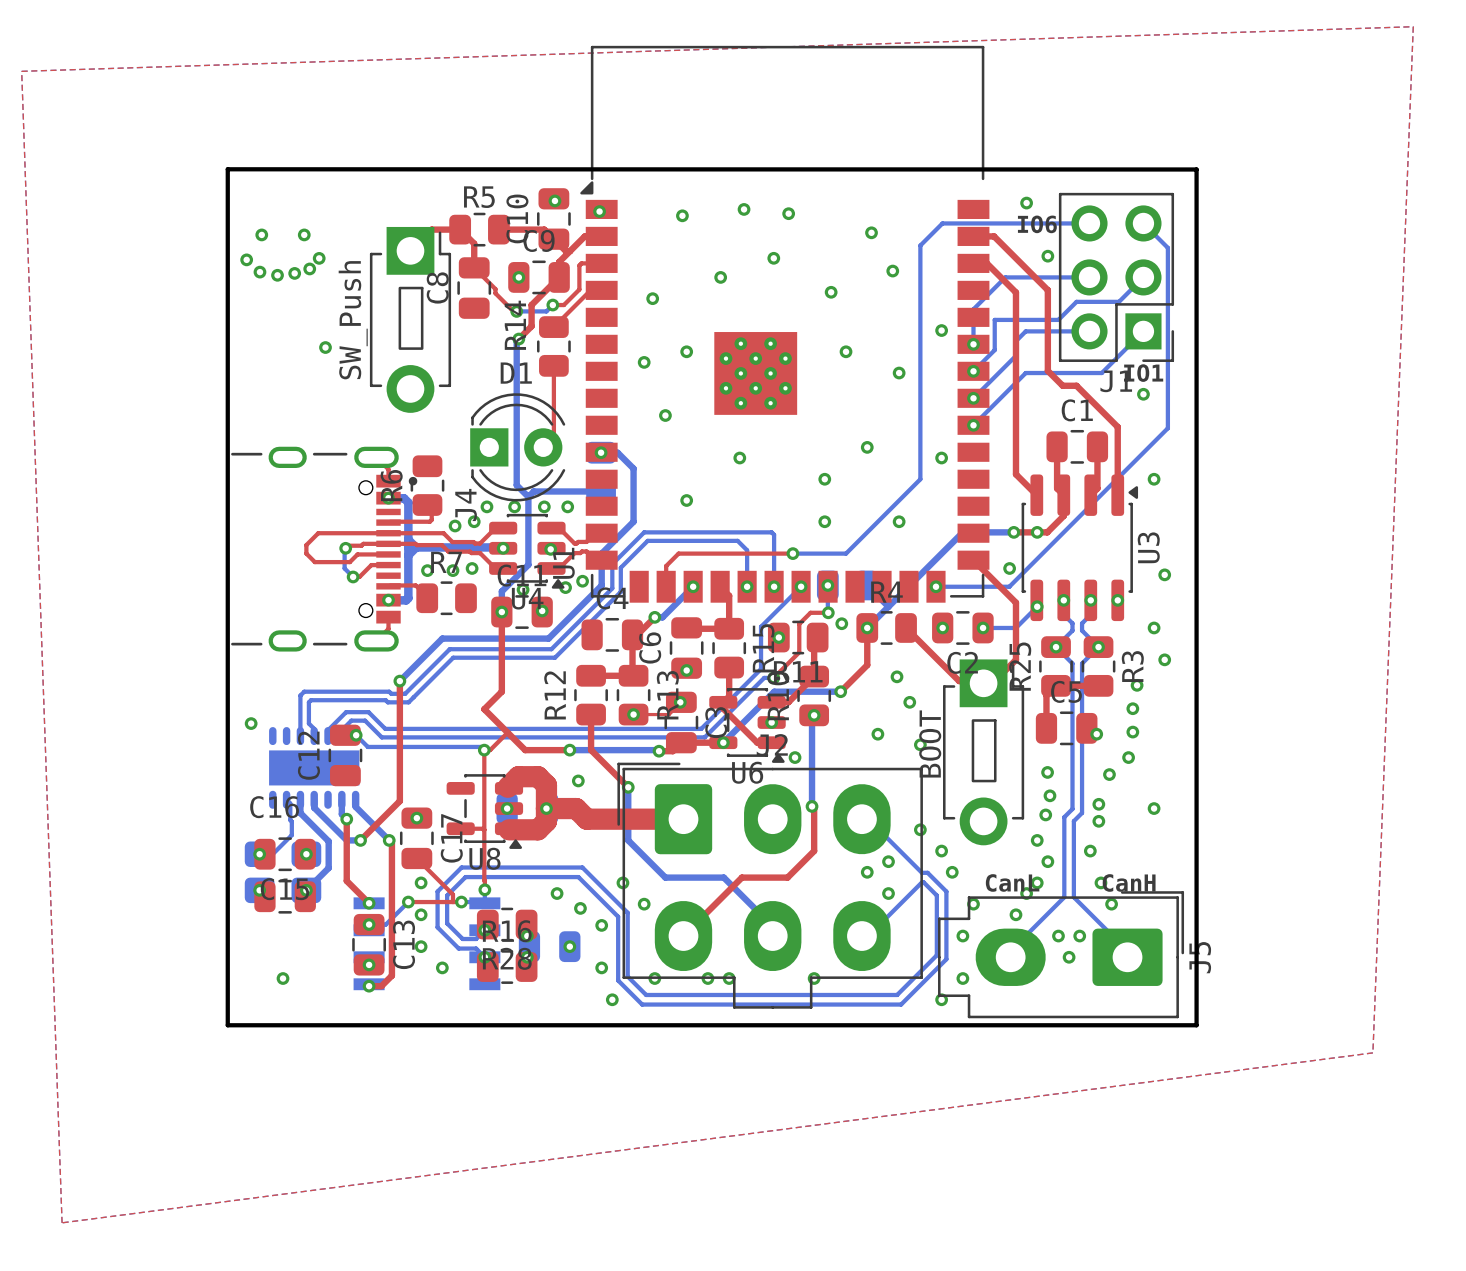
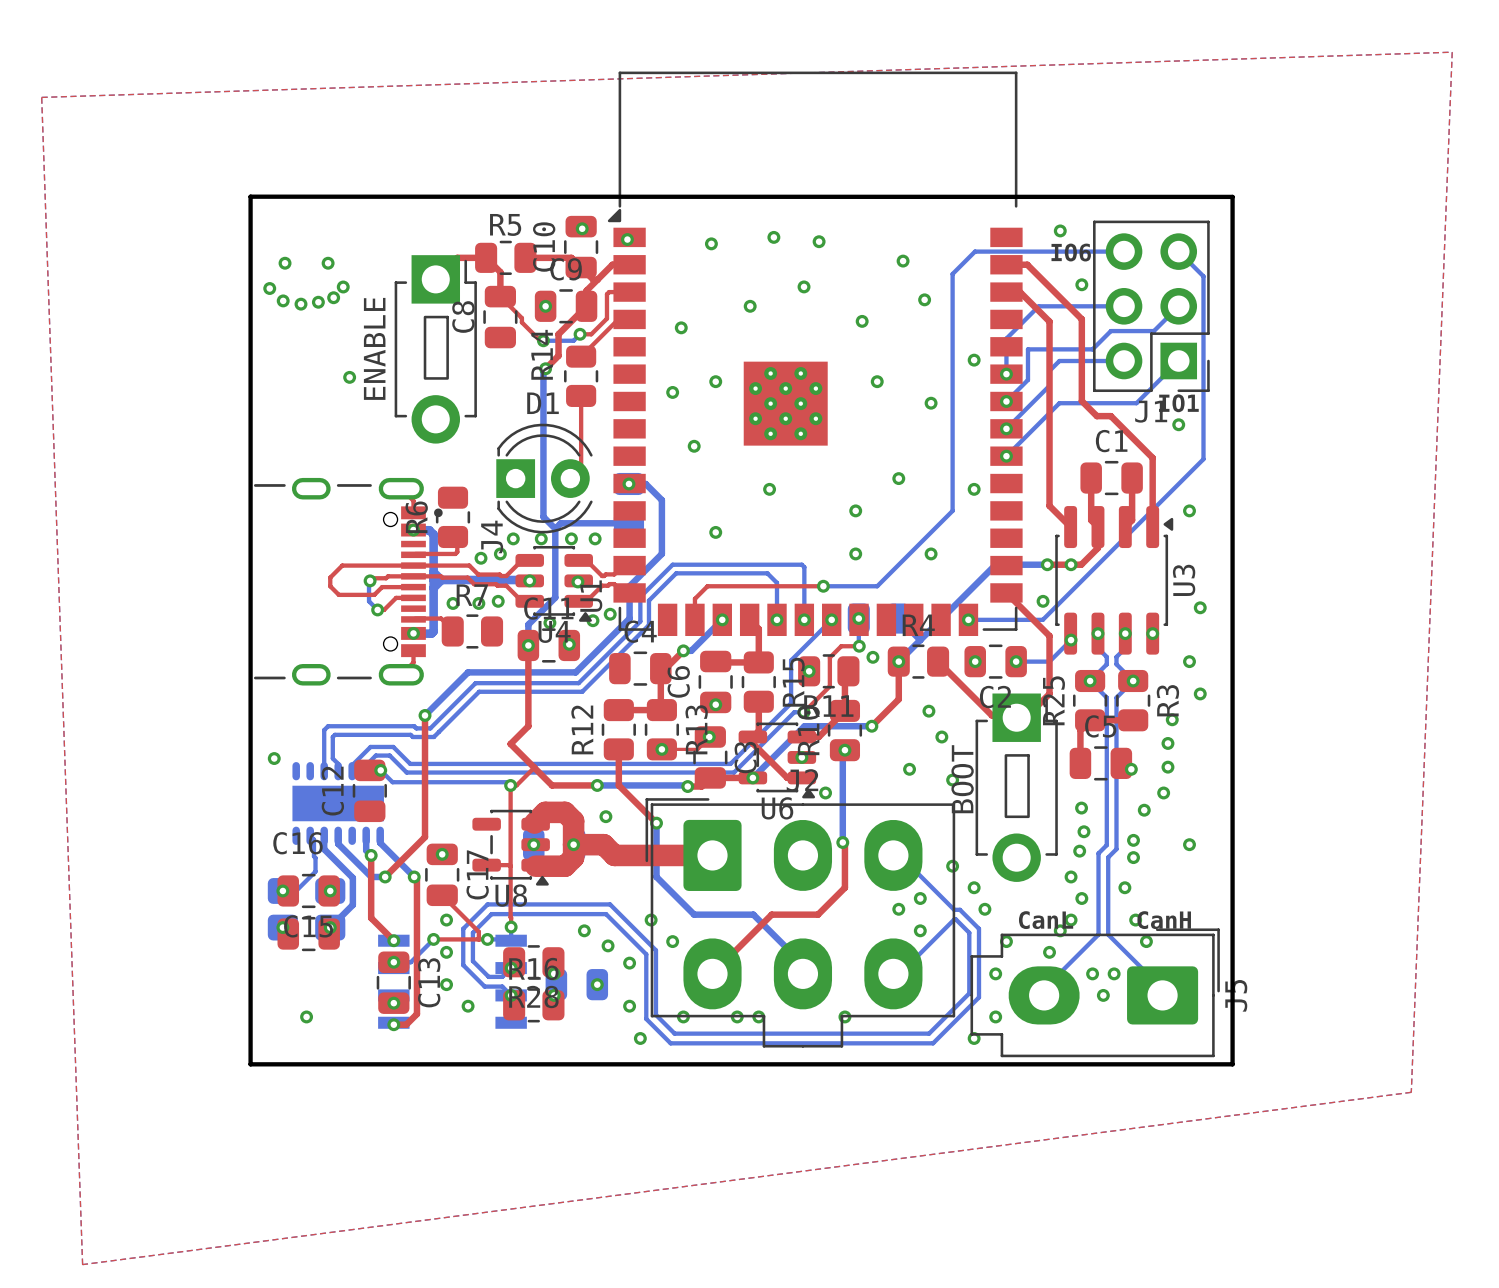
part value: SW_Push (353, 320) -> ENABLE (374, 348)

